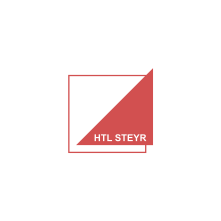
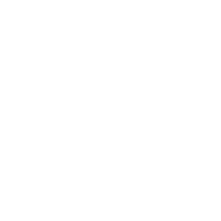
drawing: [68, 68, 154, 154] -> none

